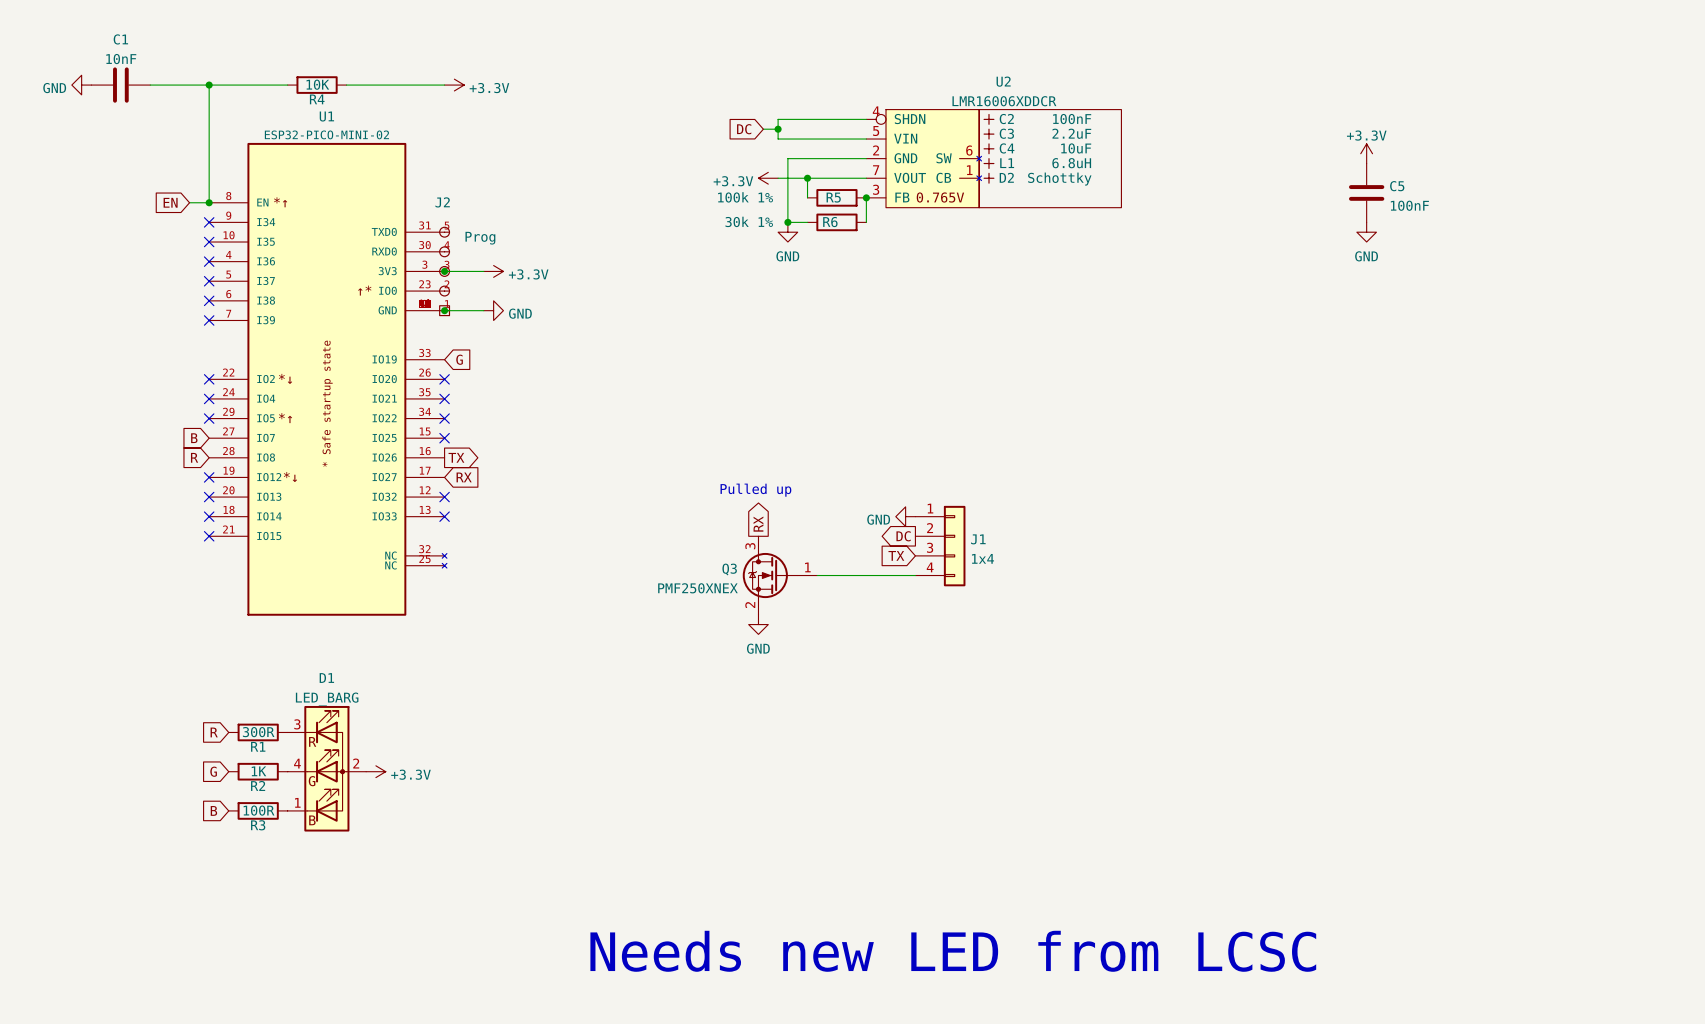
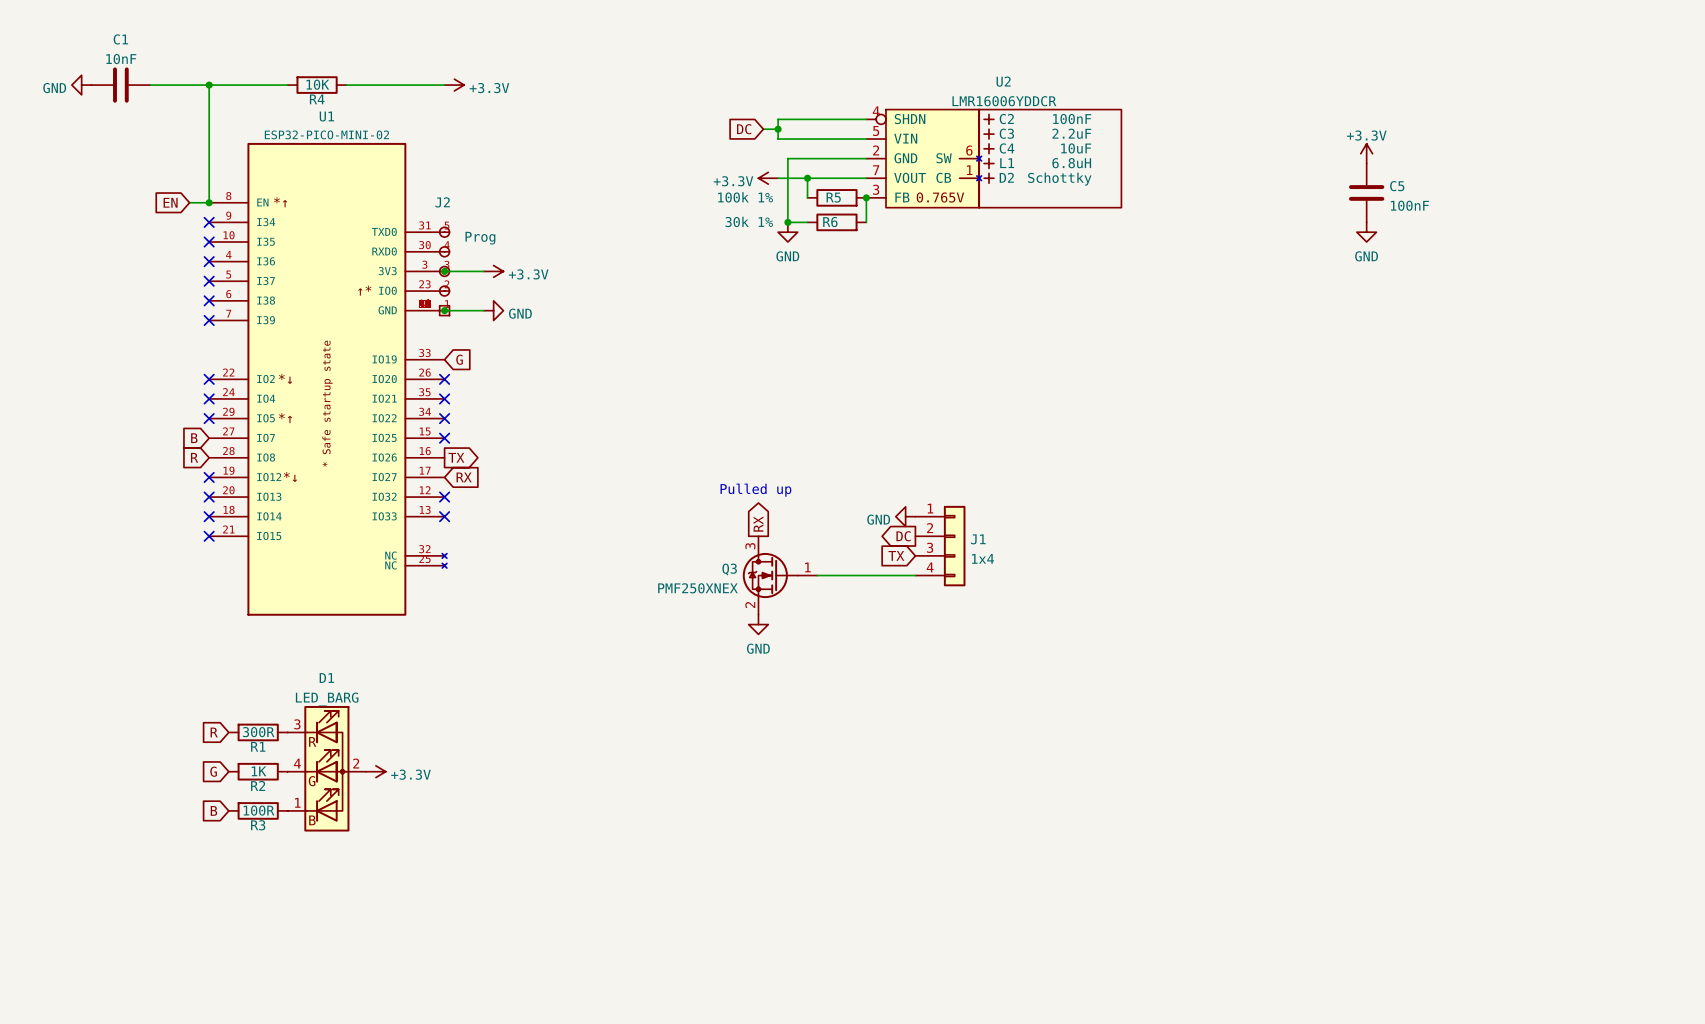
U2 value: LMR16006XDDCR (1004, 101) -> LMR16006YDDCR (1004, 101)
text: Needs new LED from LCSC (953, 951) -> none

